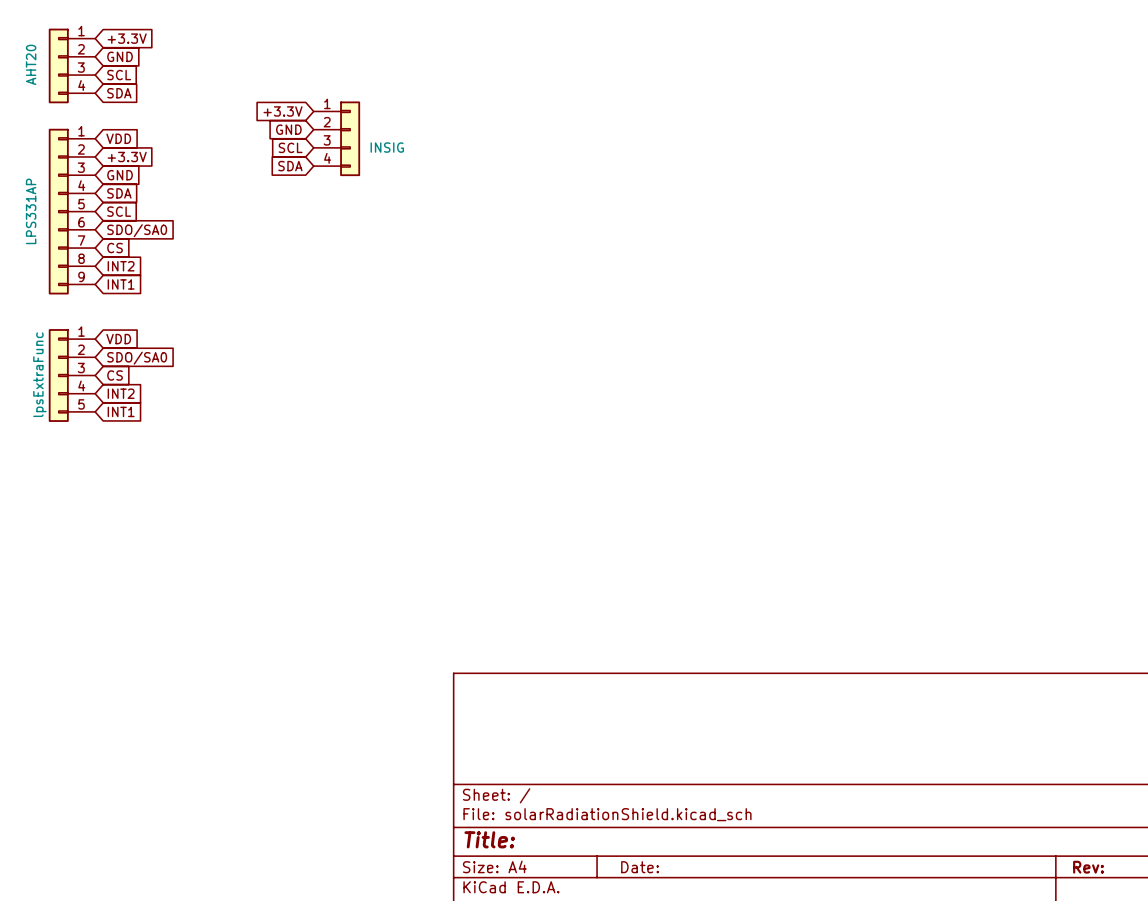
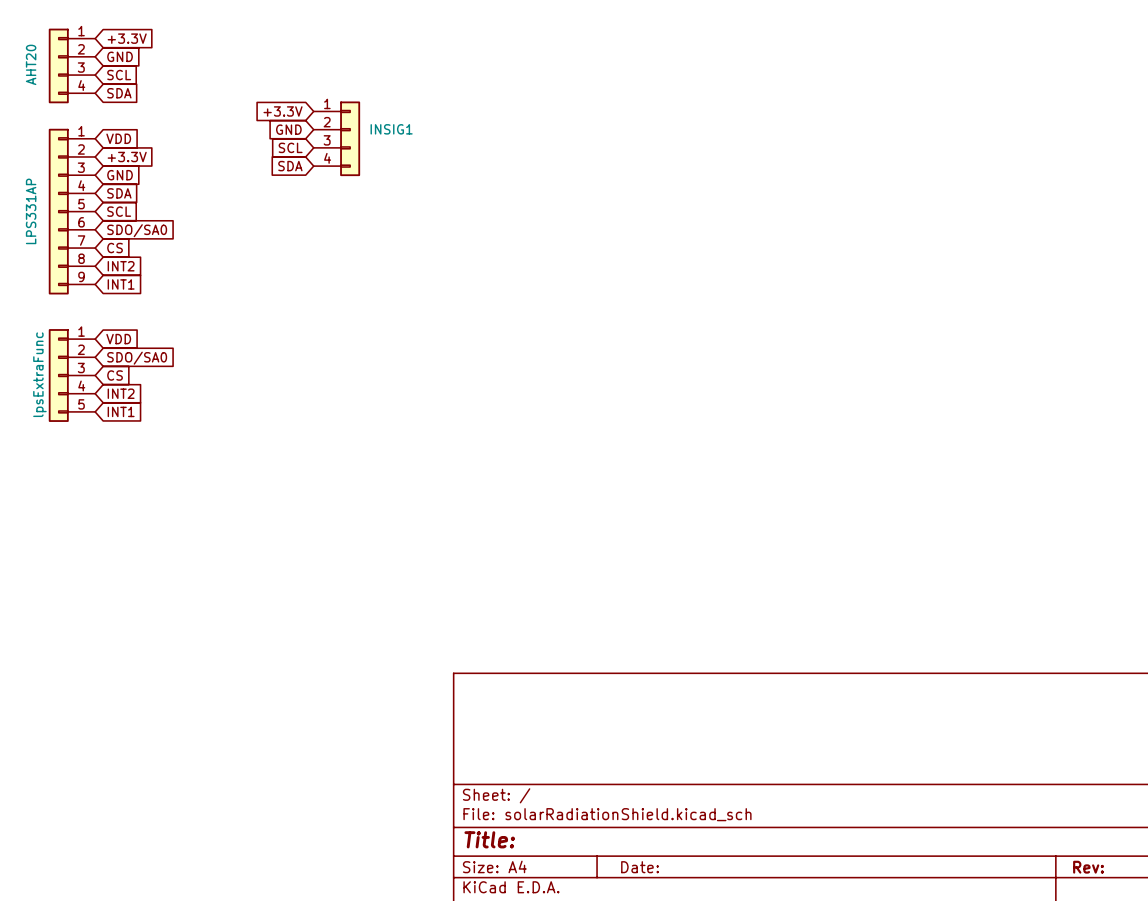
INSIG1 name: none -> INSIG1 (391, 129)
INSIG1 value: INSIG (387, 147) -> none

